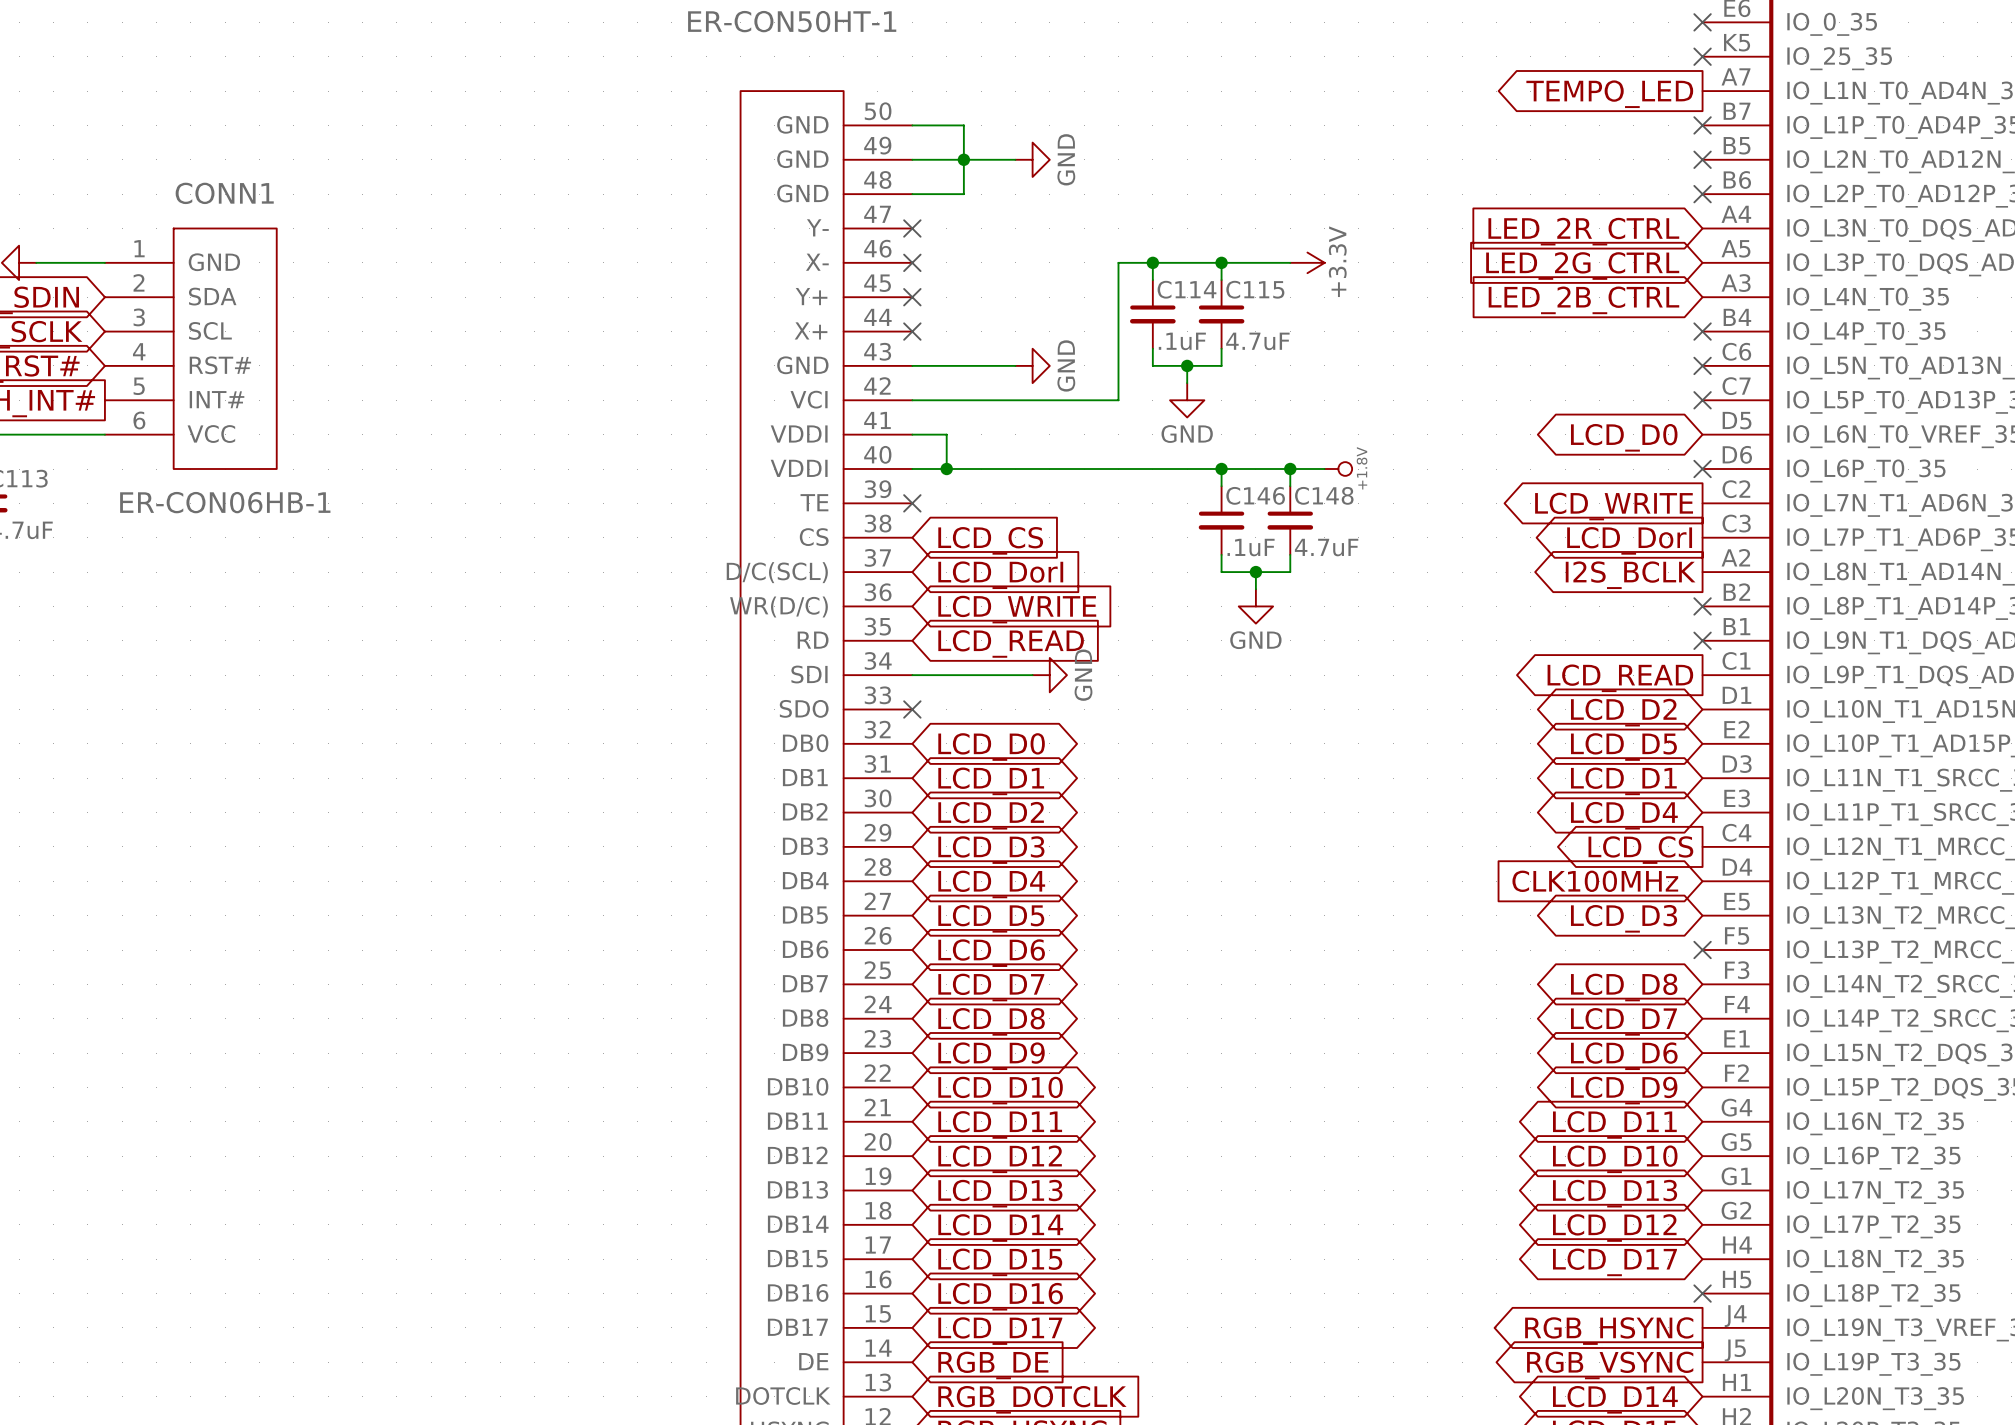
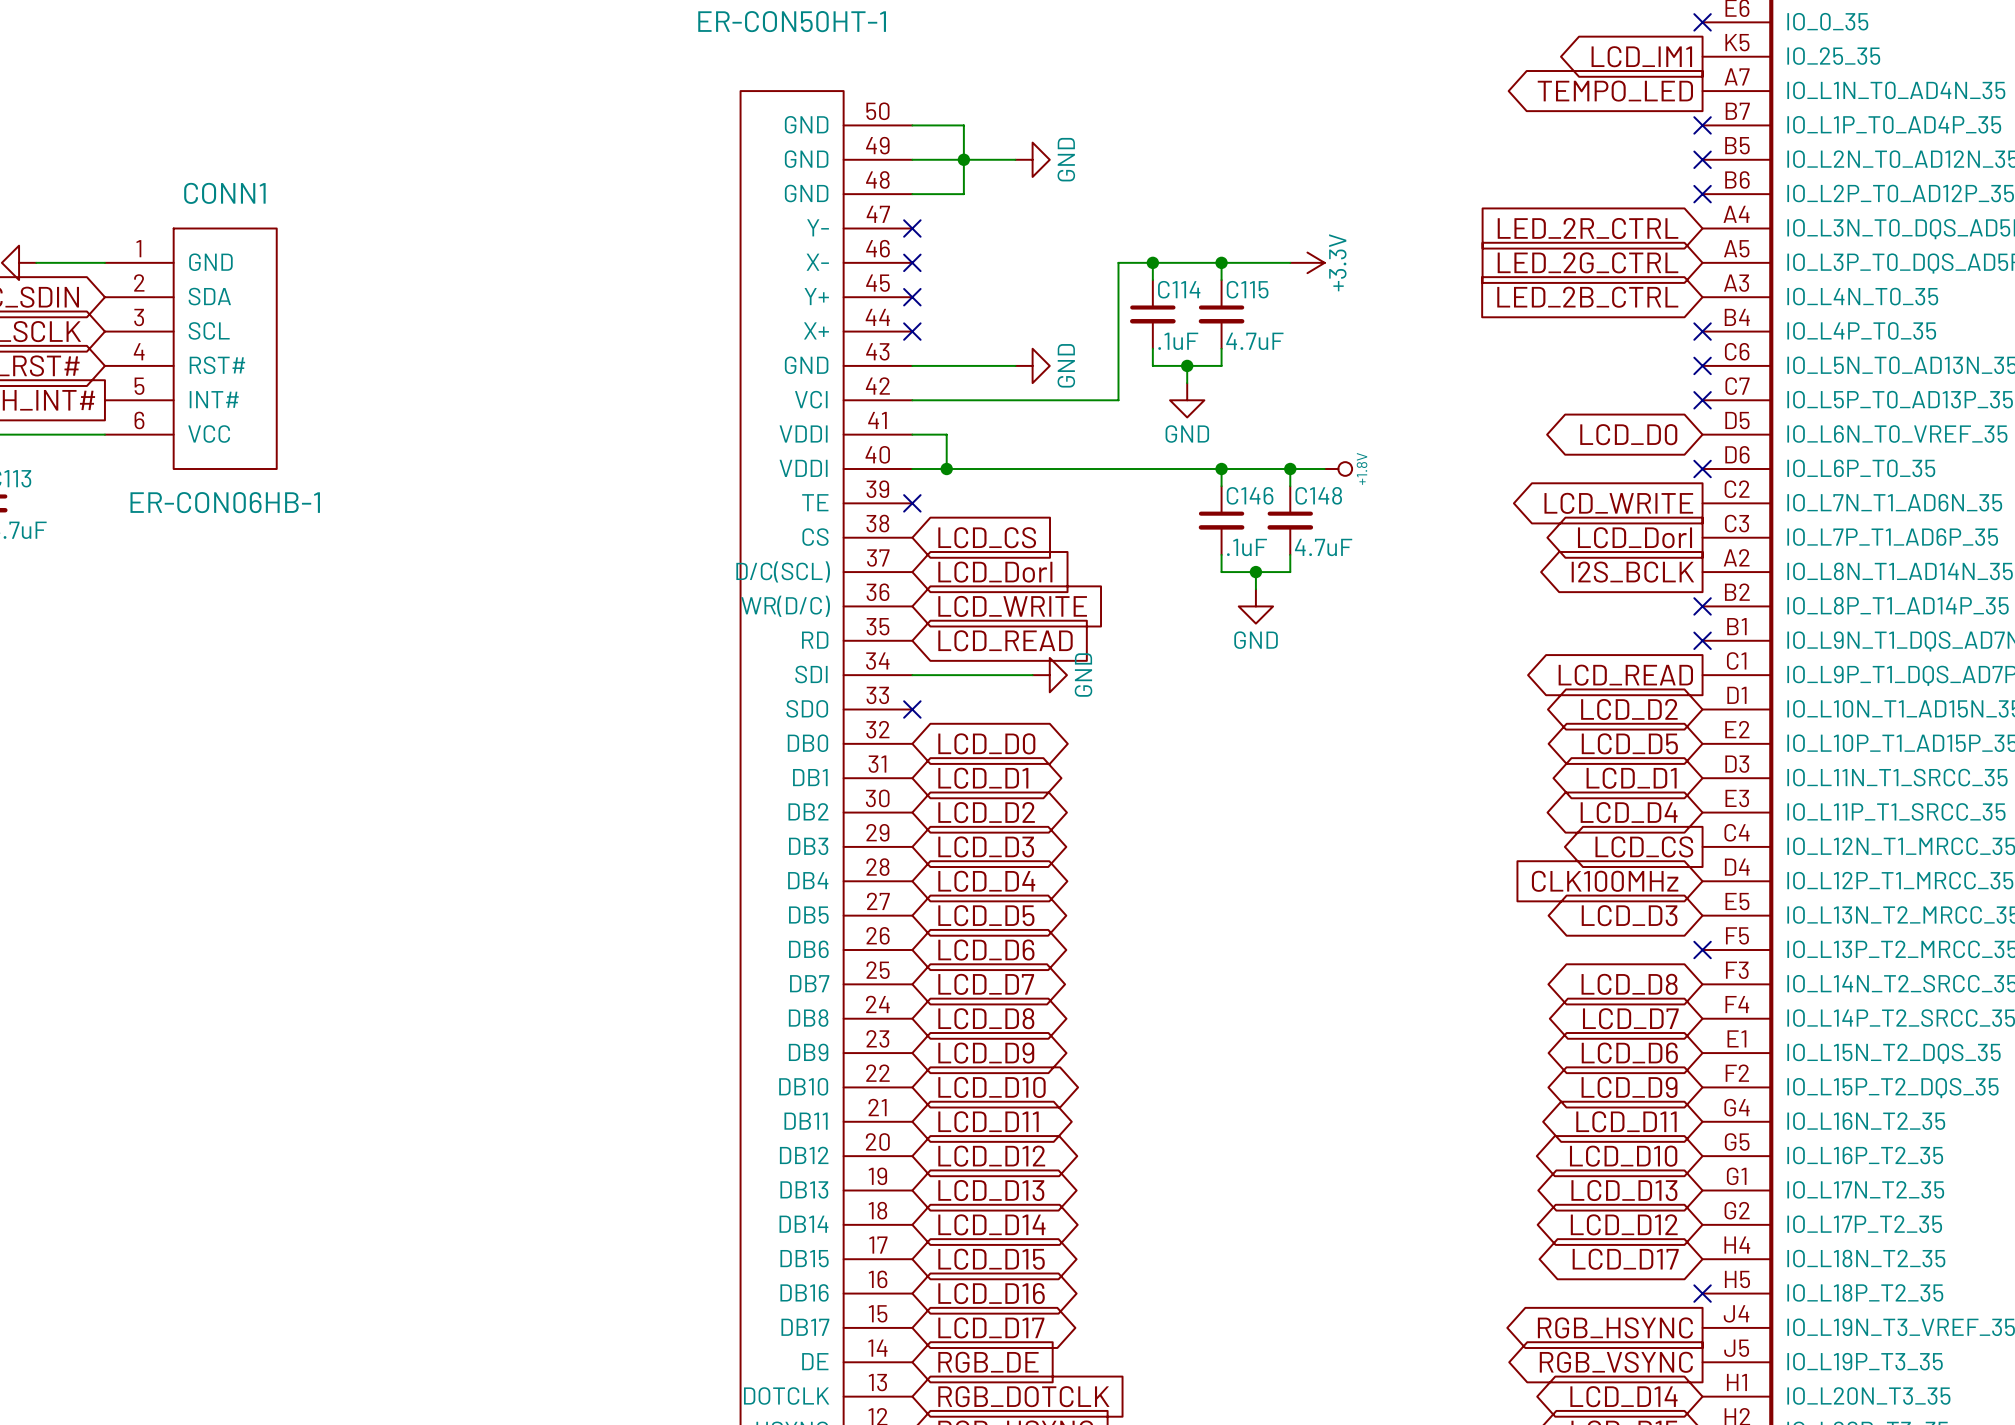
no-connect mark: (1702, 56) -> none
global label: none -> LCD_IM1 (1641, 56)

